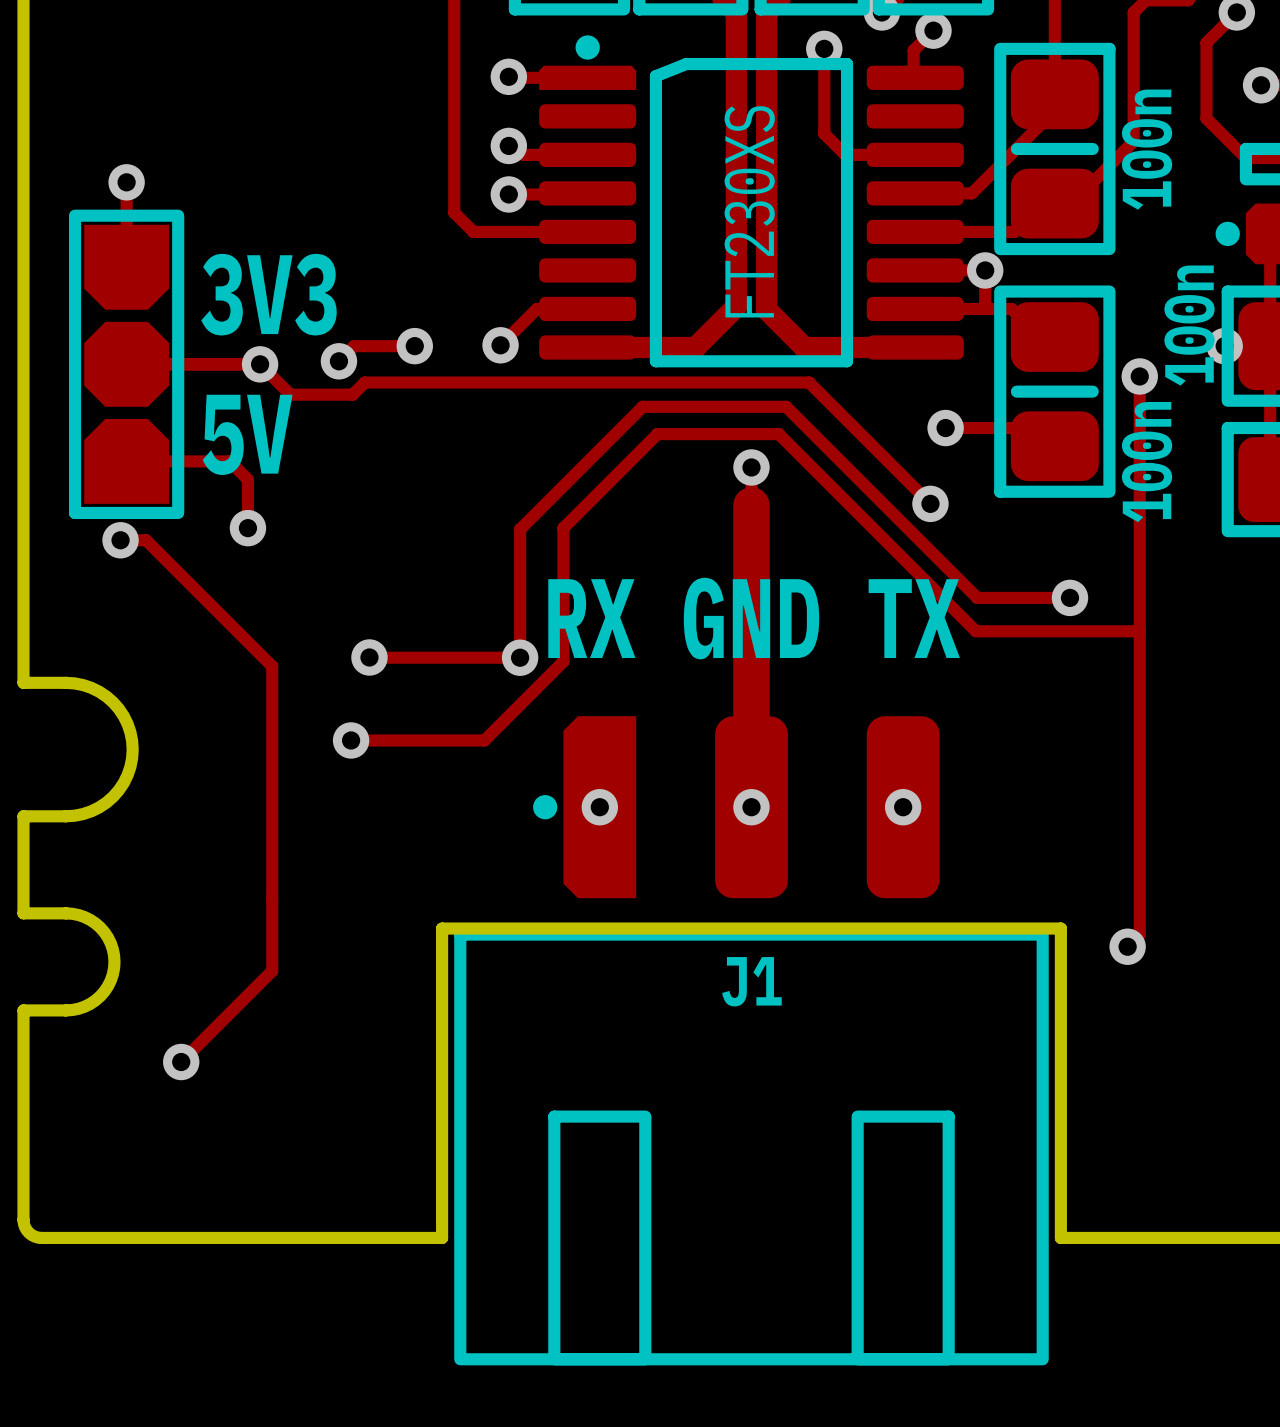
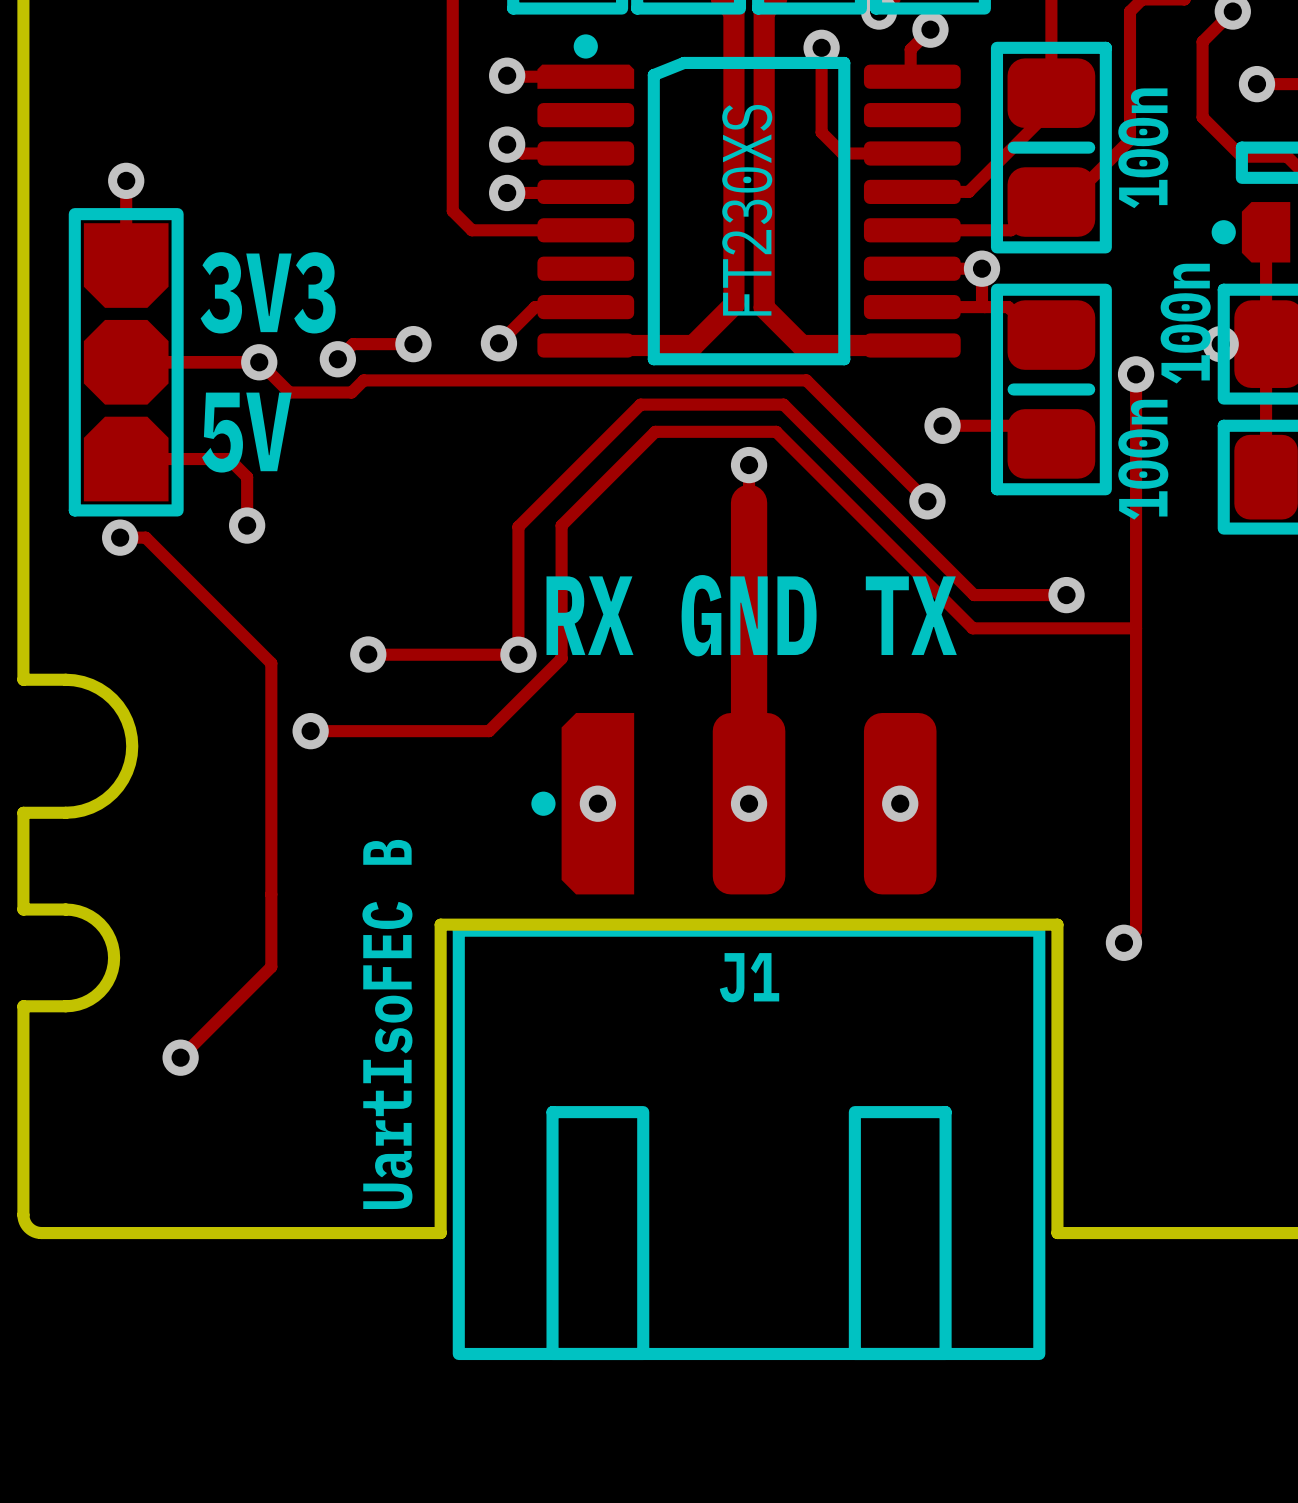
track: (490, 734) (484, 740) (351, 740) -> (489, 731) (310, 731)
via position: (351, 740) -> (310, 731)
text: none -> UartIsoFEC B (387, 1024)

